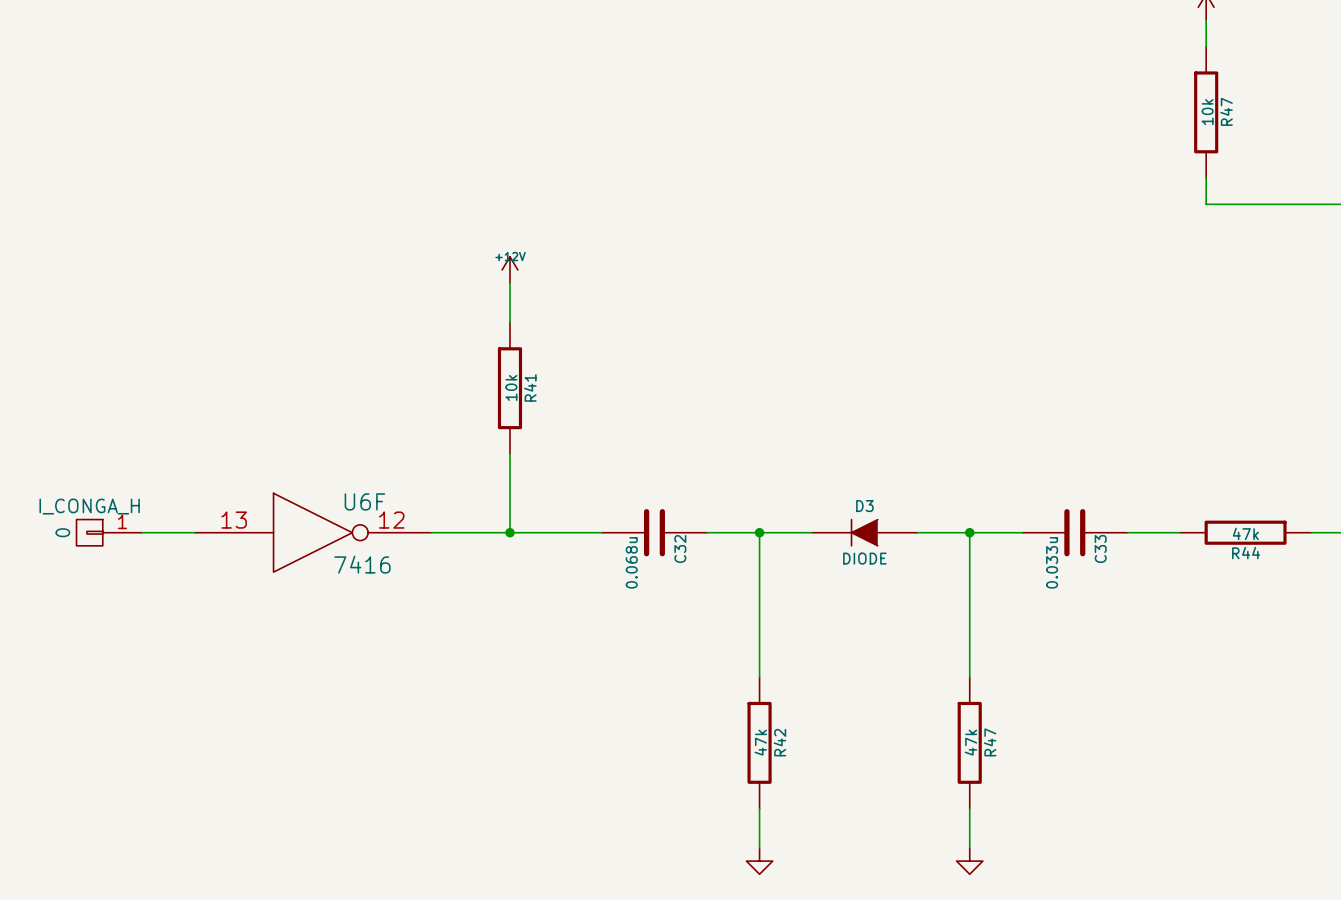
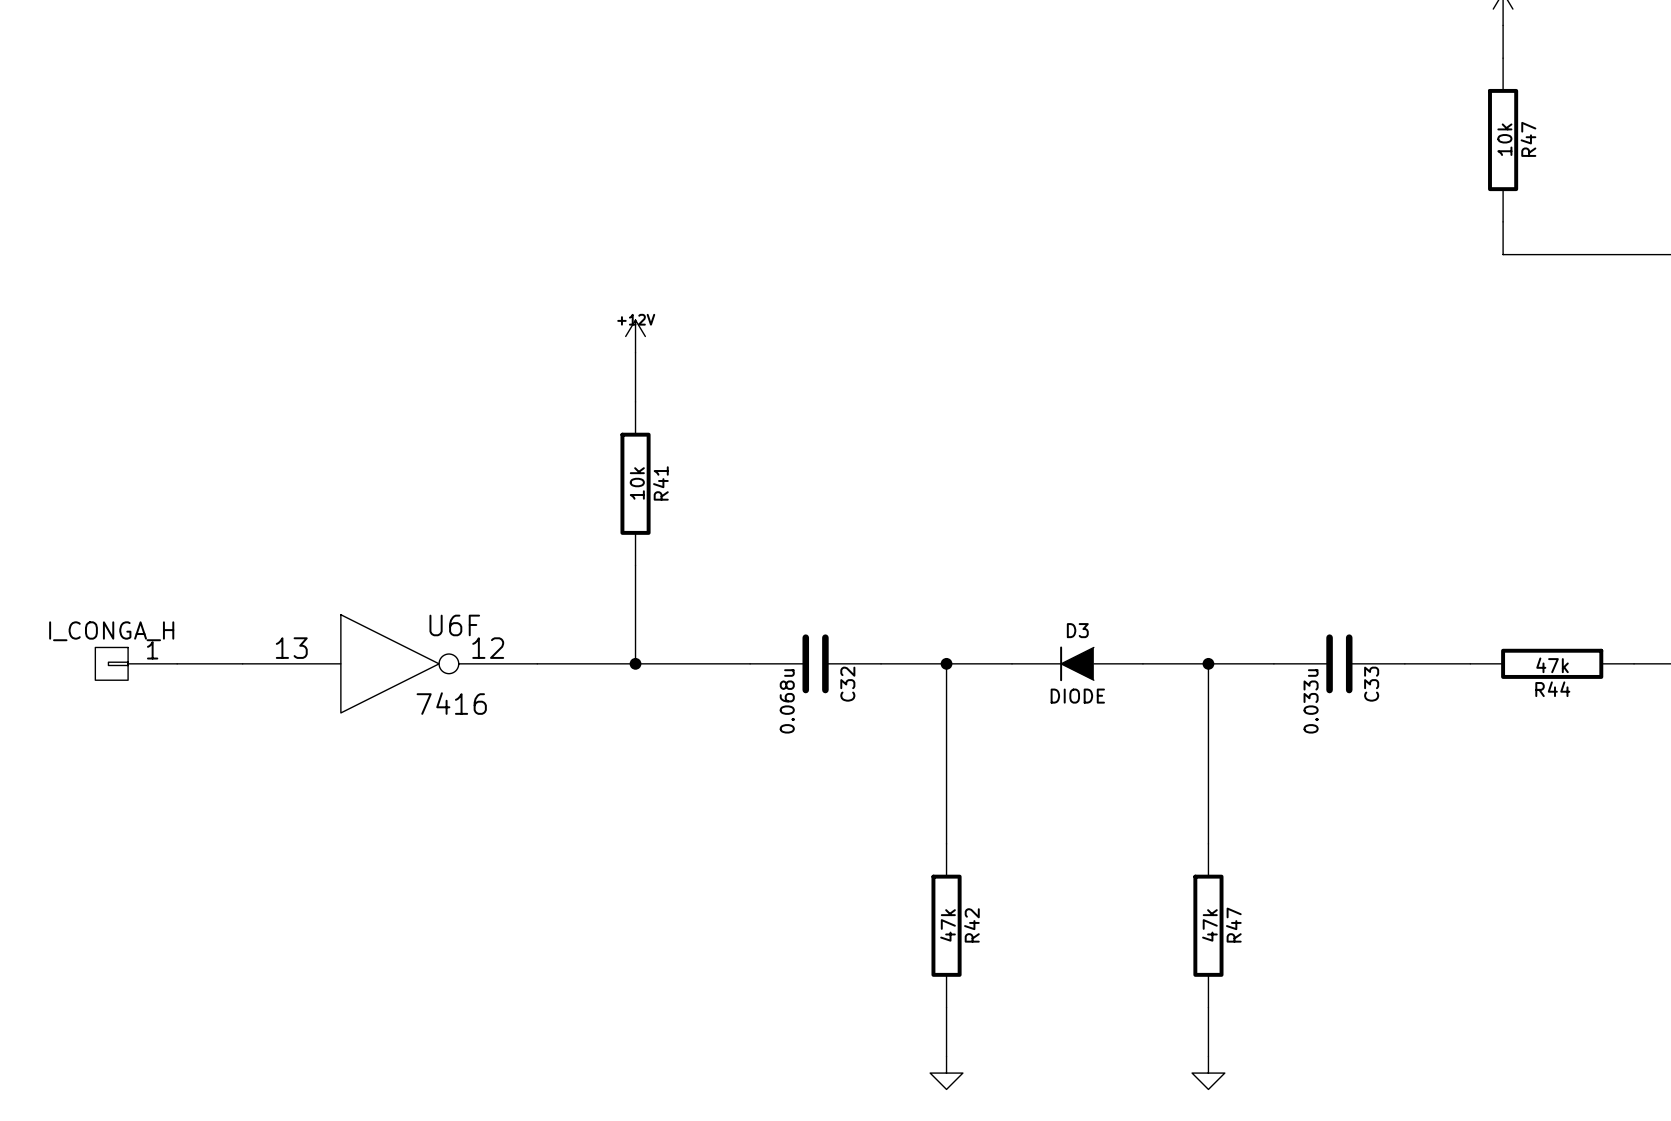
I_CONGA_H value: 0 (62, 532) -> none

